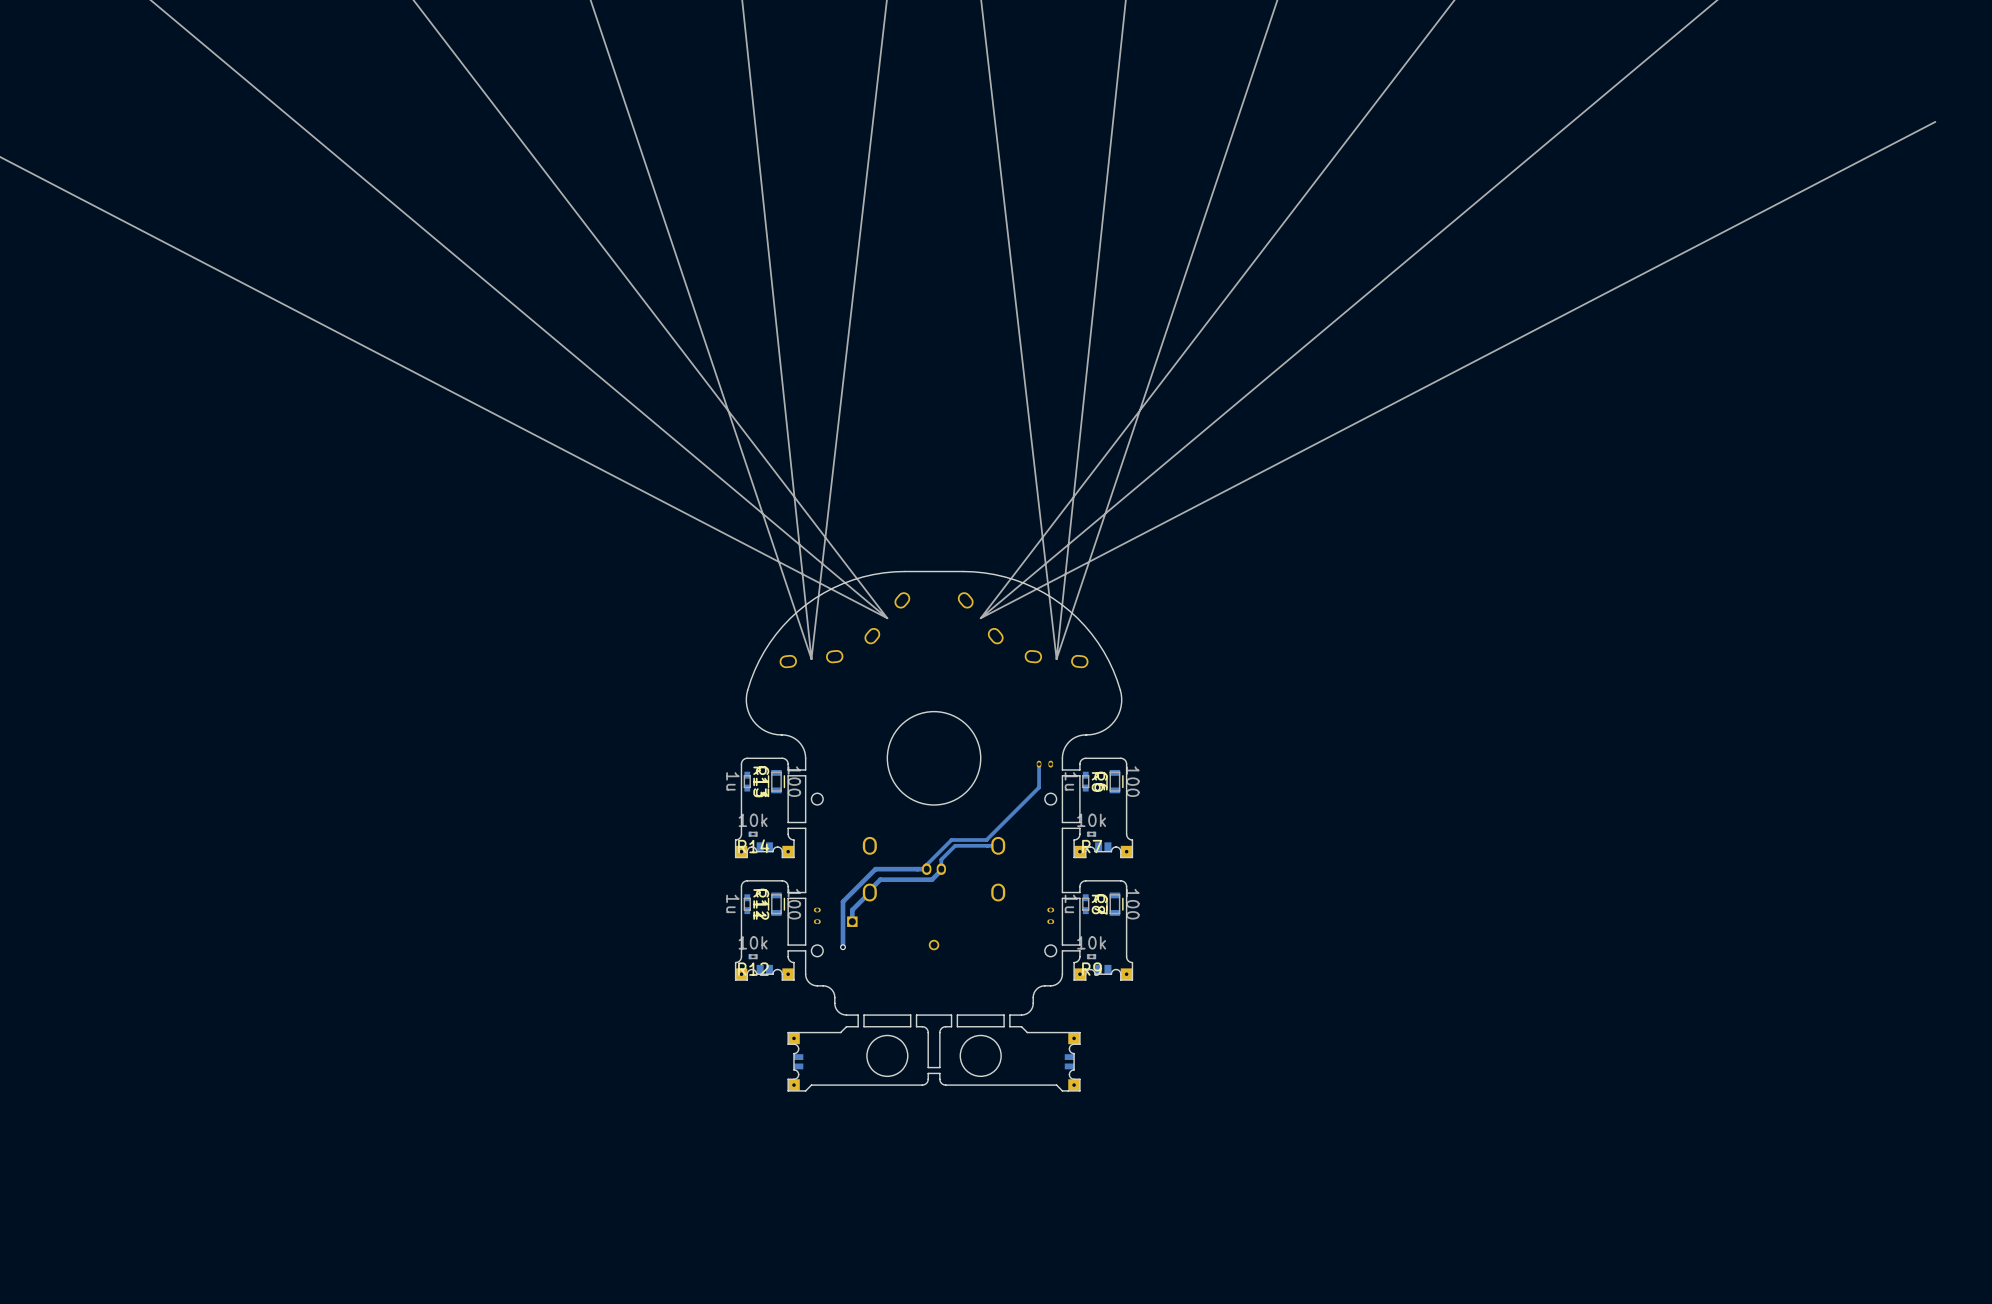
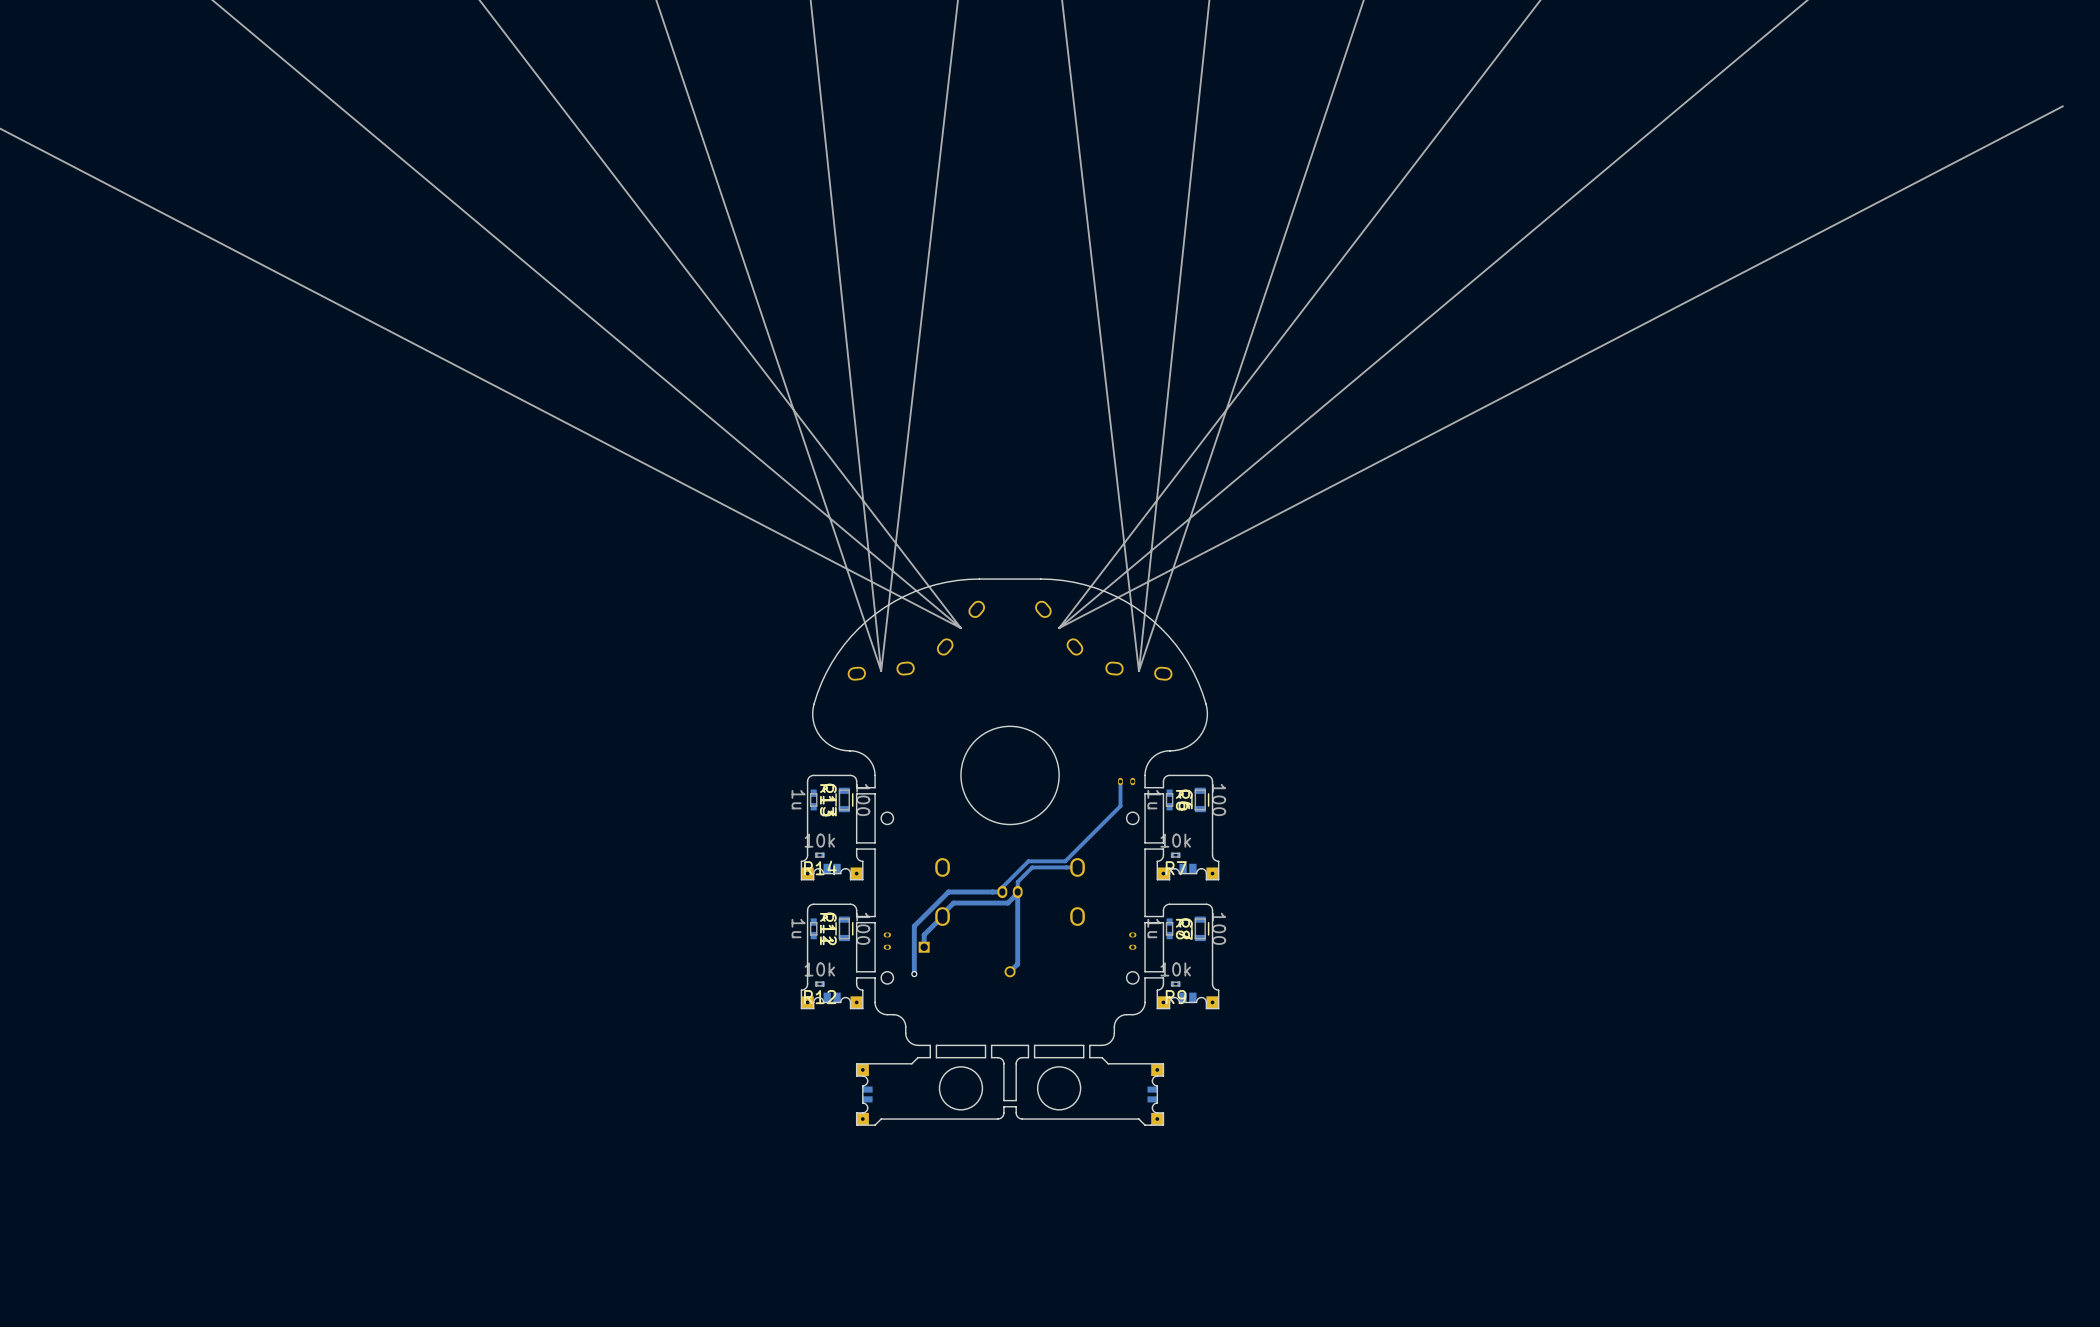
track: none -> (1017, 893) (1017, 964) (1010, 971)

